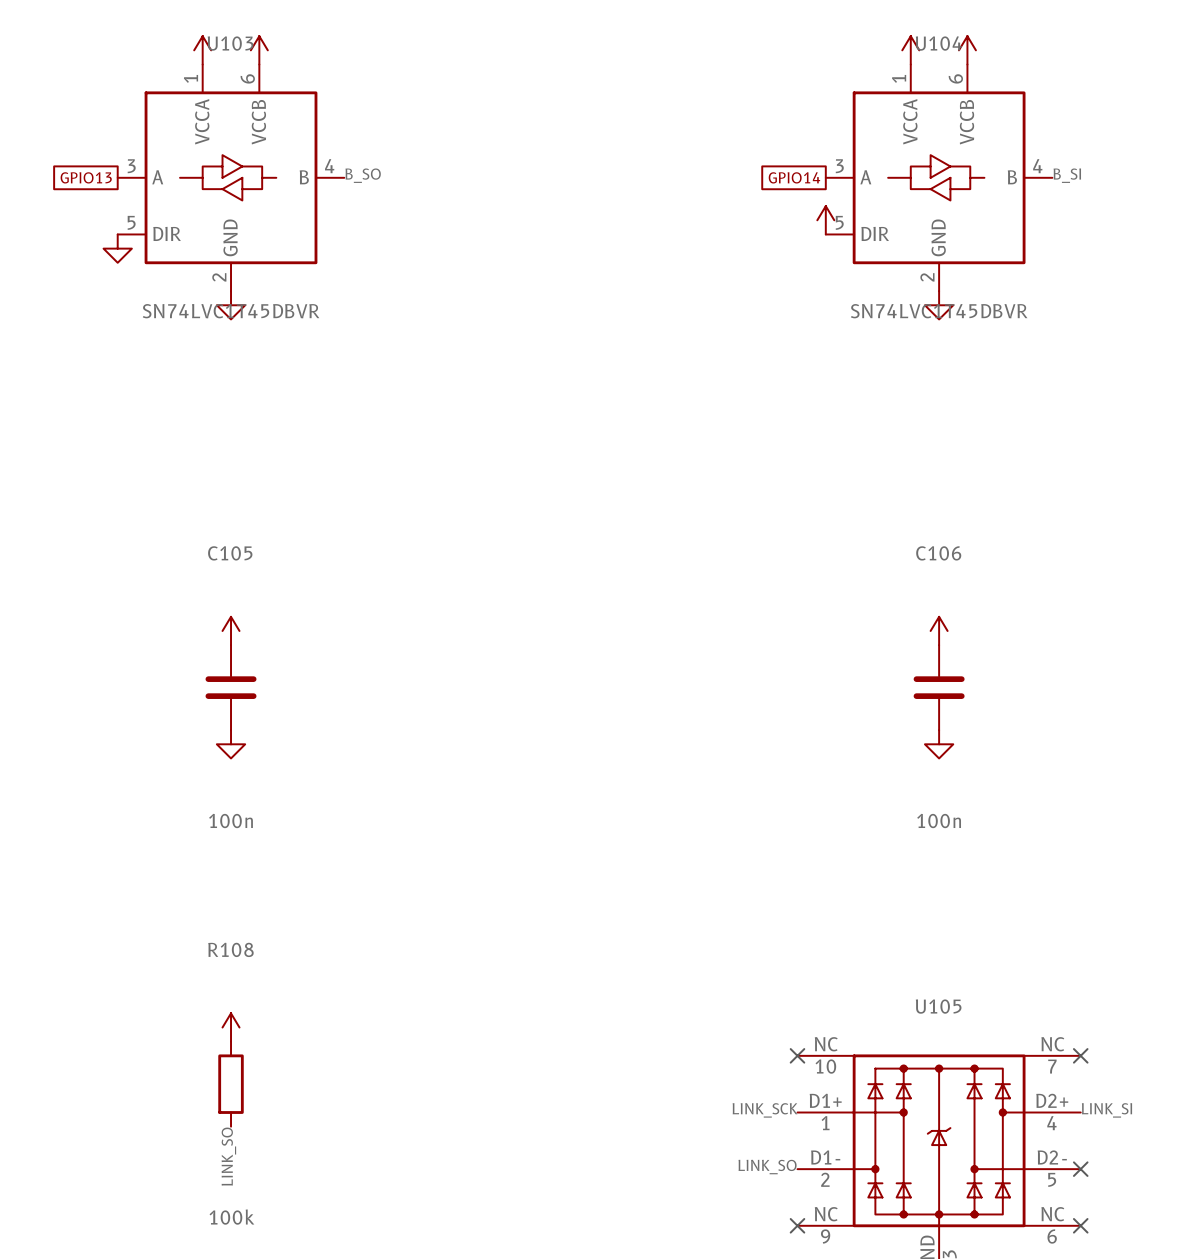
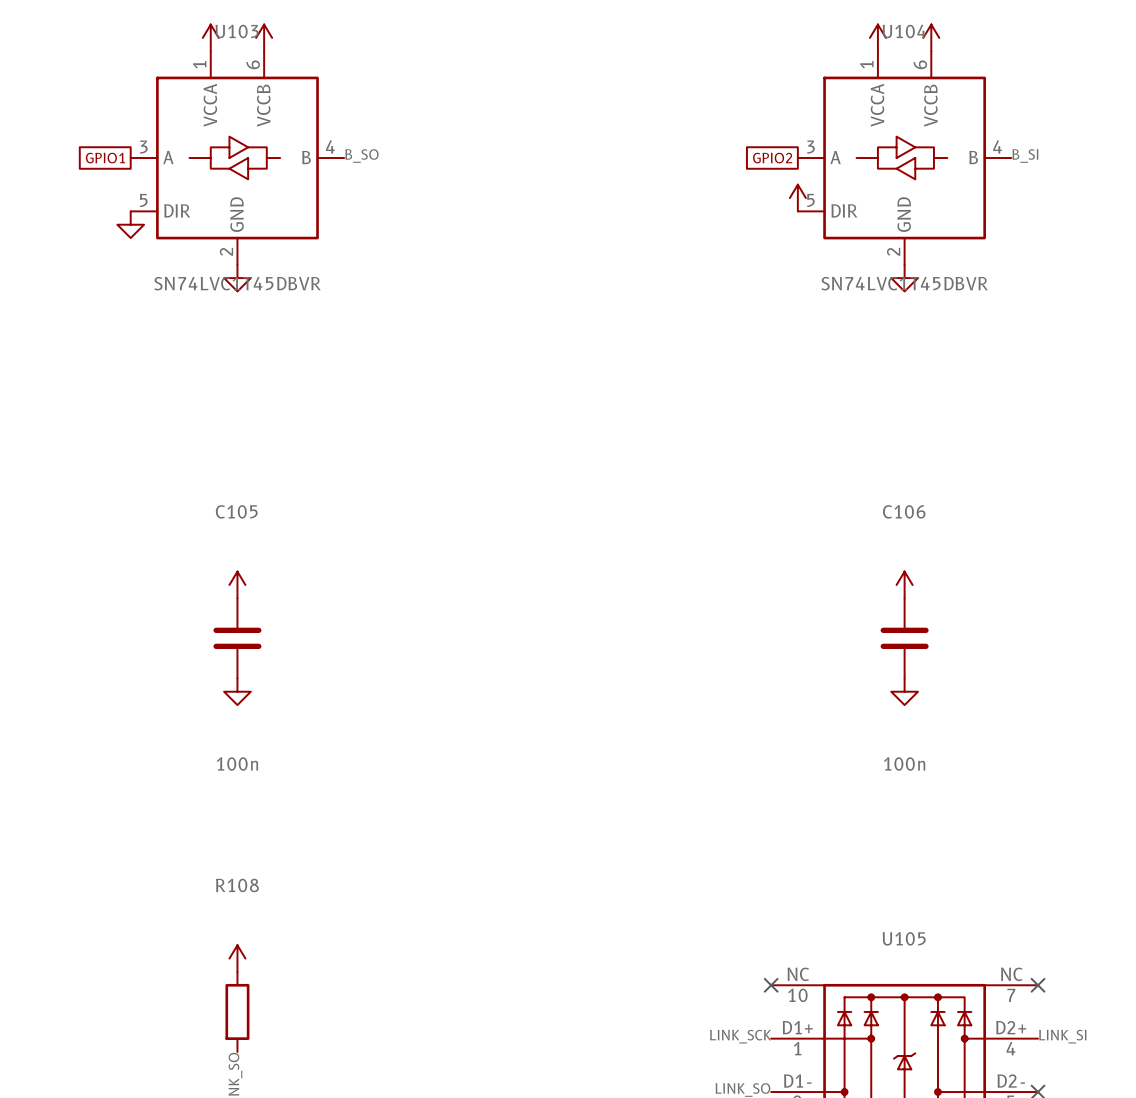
global label: GPIO13 (86, 177) -> GPIO1 (105, 158)
global label: GPIO14 (794, 177) -> GPIO2 (772, 158)

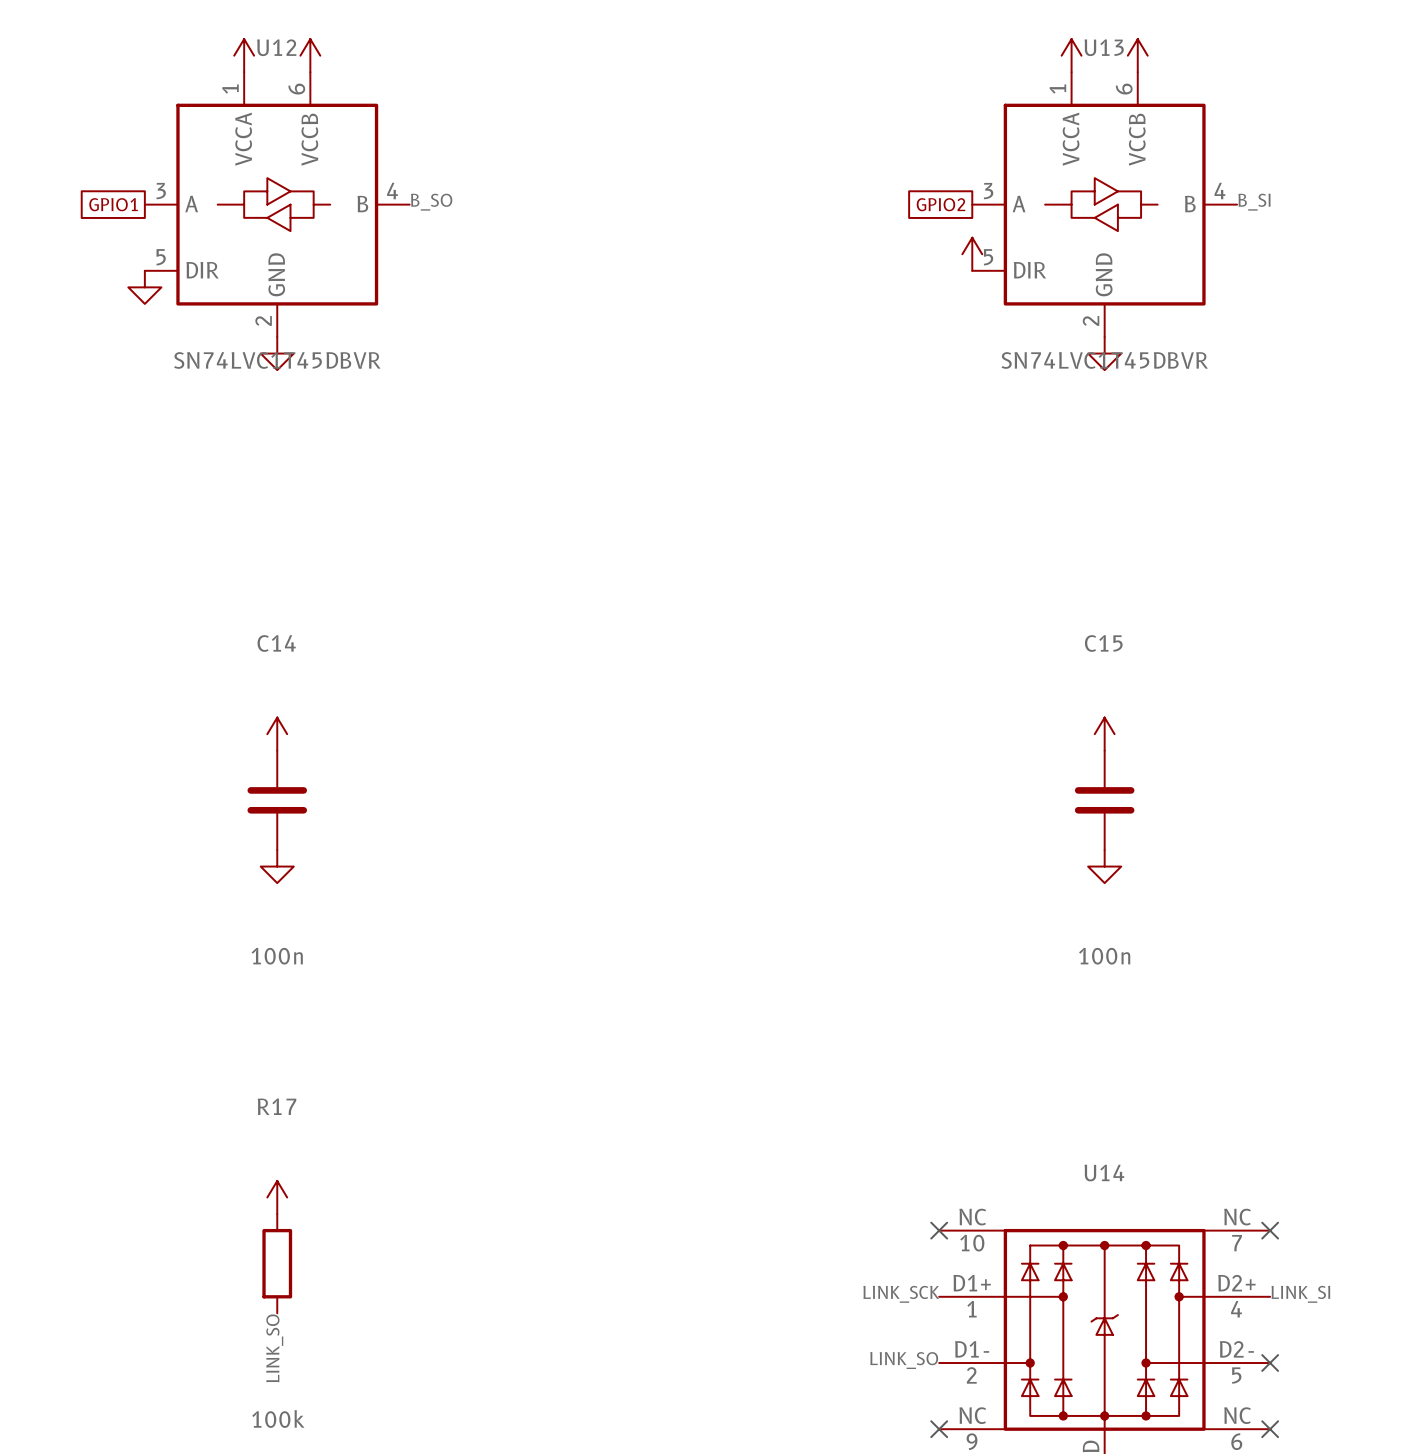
U103 name: U103 (237, 31) -> U12 (276, 47)
U104 name: U104 (904, 31) -> U13 (1104, 47)
C105 name: C105 (236, 511) -> C14 (276, 643)
C106 name: C106 (904, 511) -> C15 (1103, 643)
R108 name: R108 (237, 885) -> R17 (277, 1106)
U105 name: U105 (904, 938) -> U14 (1104, 1173)

